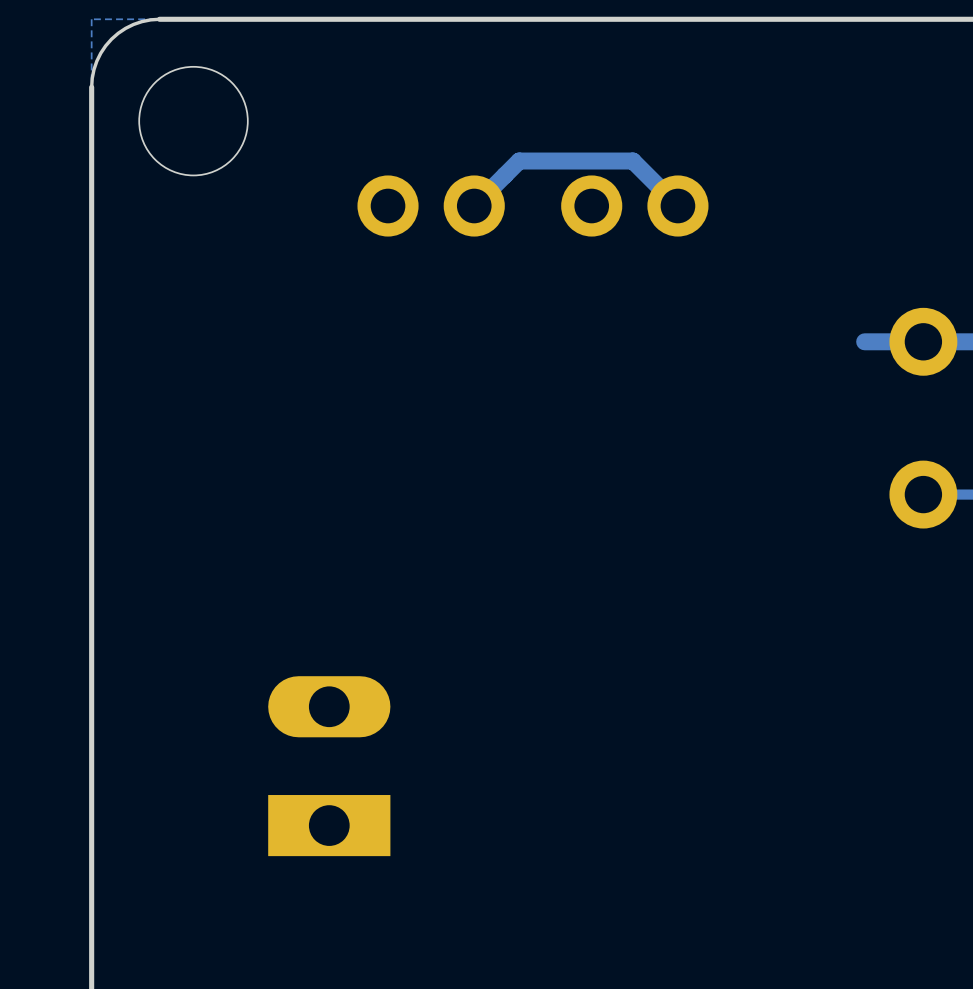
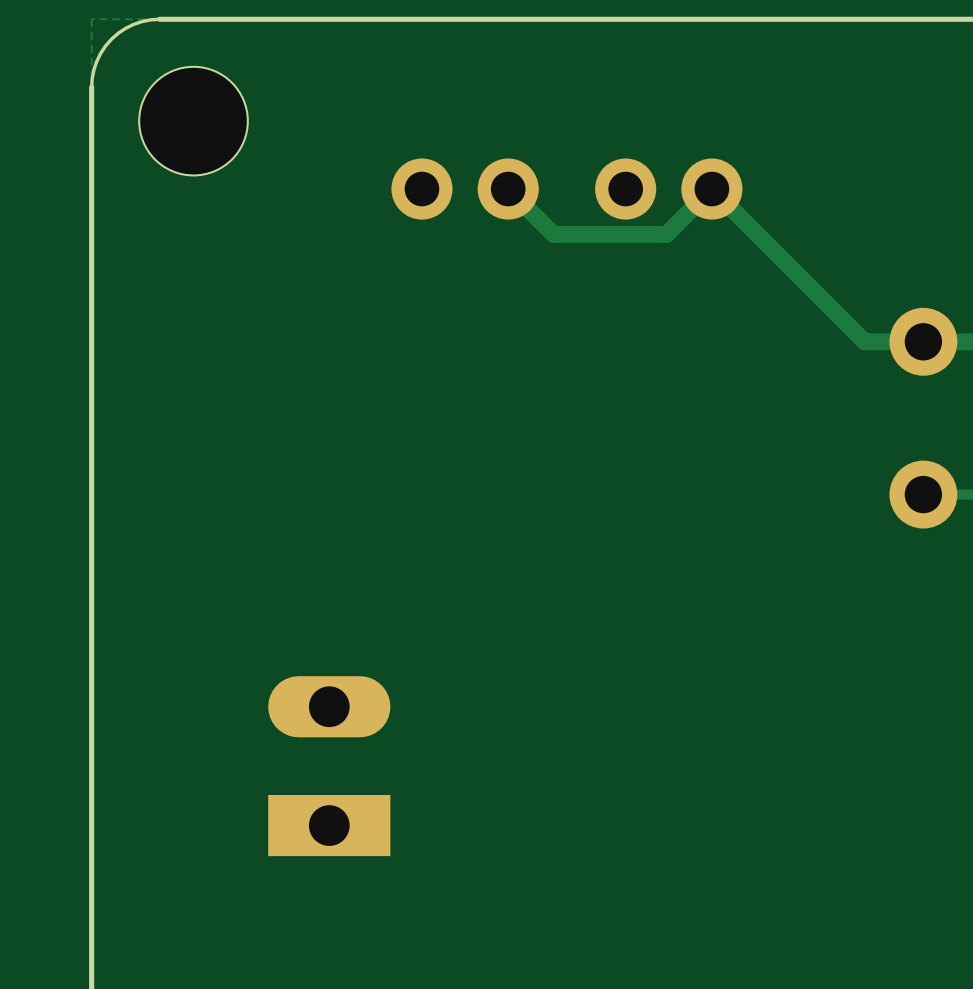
track: none -> (508, 189) (553, 234) (666, 234) (711, 189) (864, 341)
part position: (431, 206) -> (465, 189)
part position: (634, 206) -> (668, 189)
track: (677, 206) (632, 161) (519, 161) (474, 206) -> none

